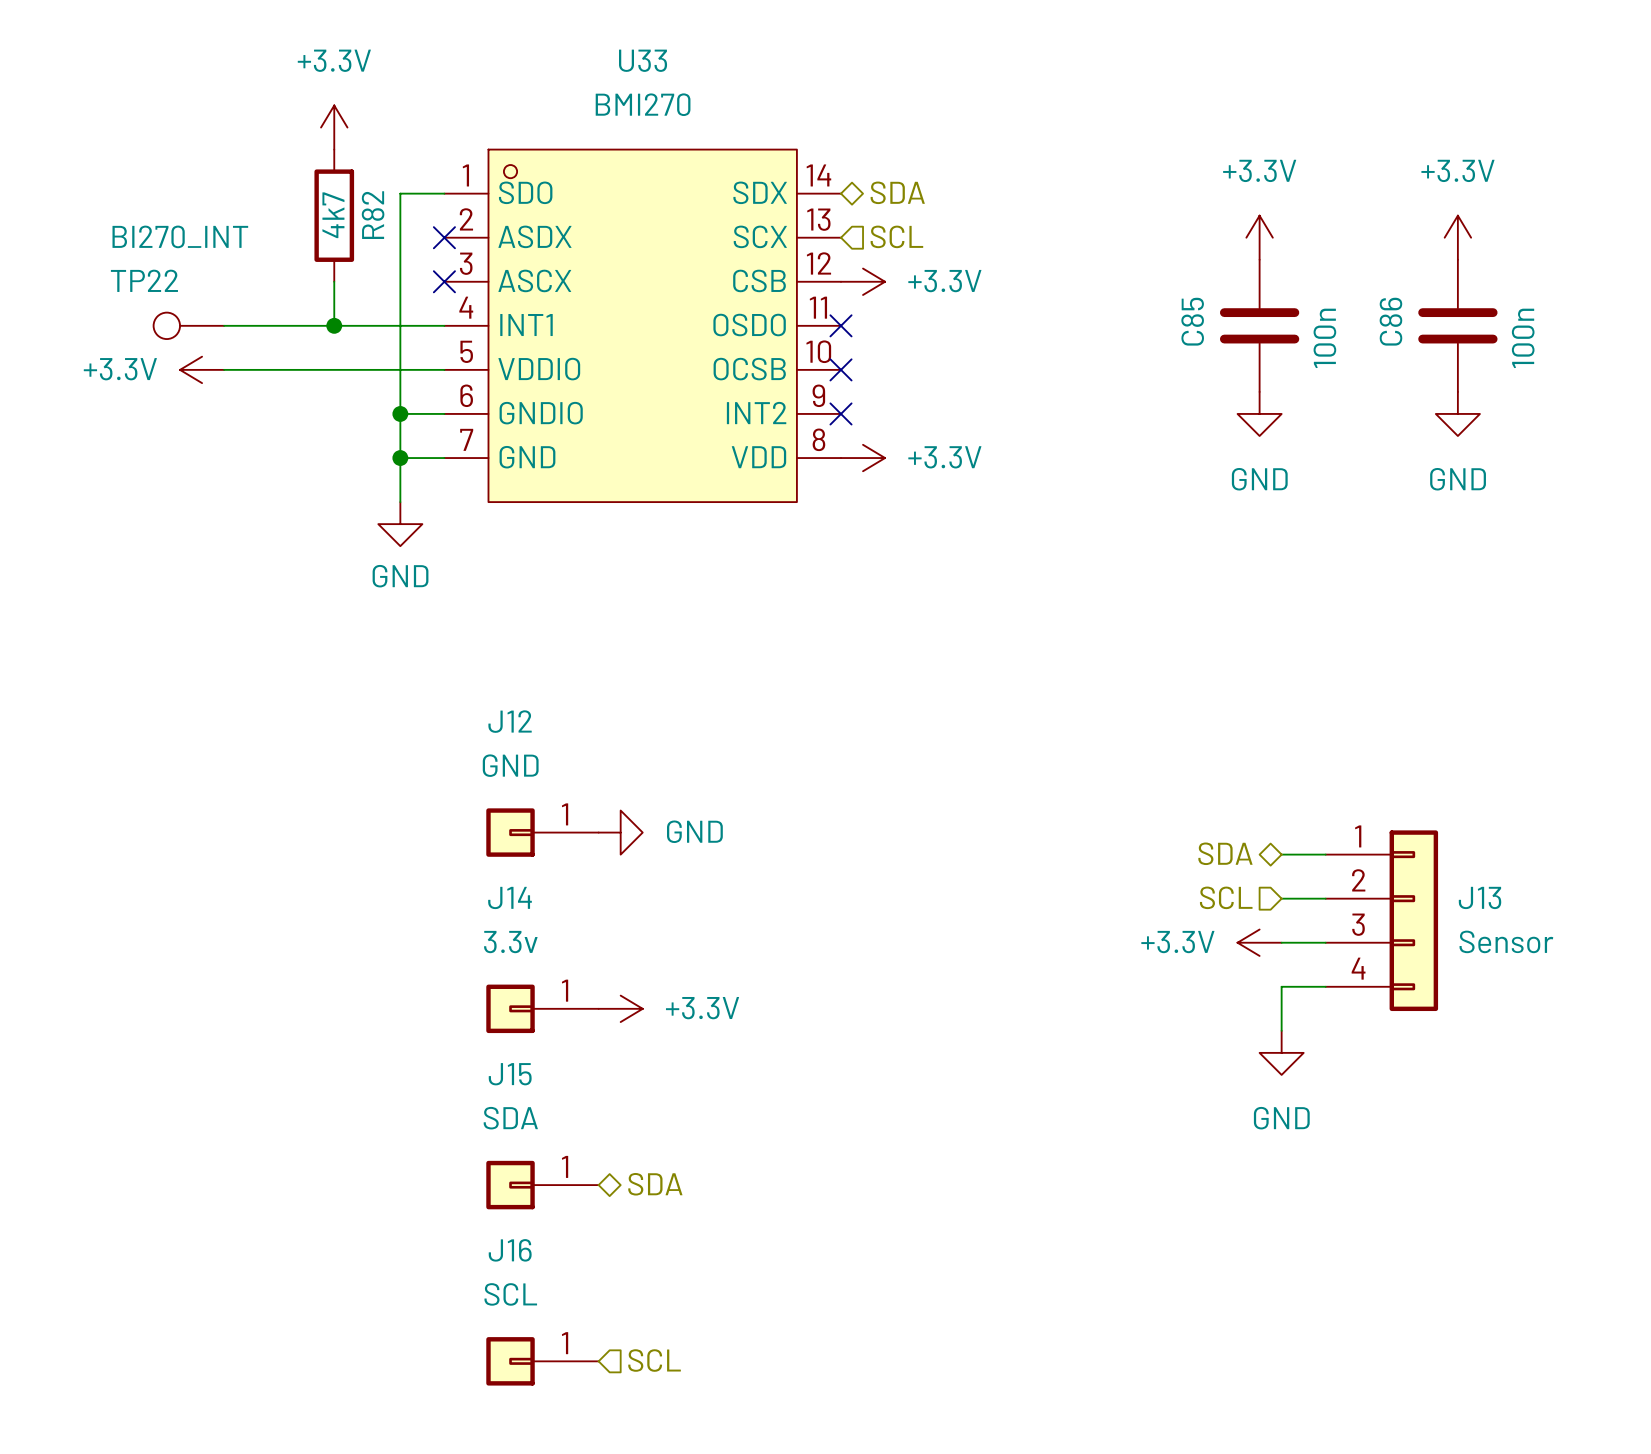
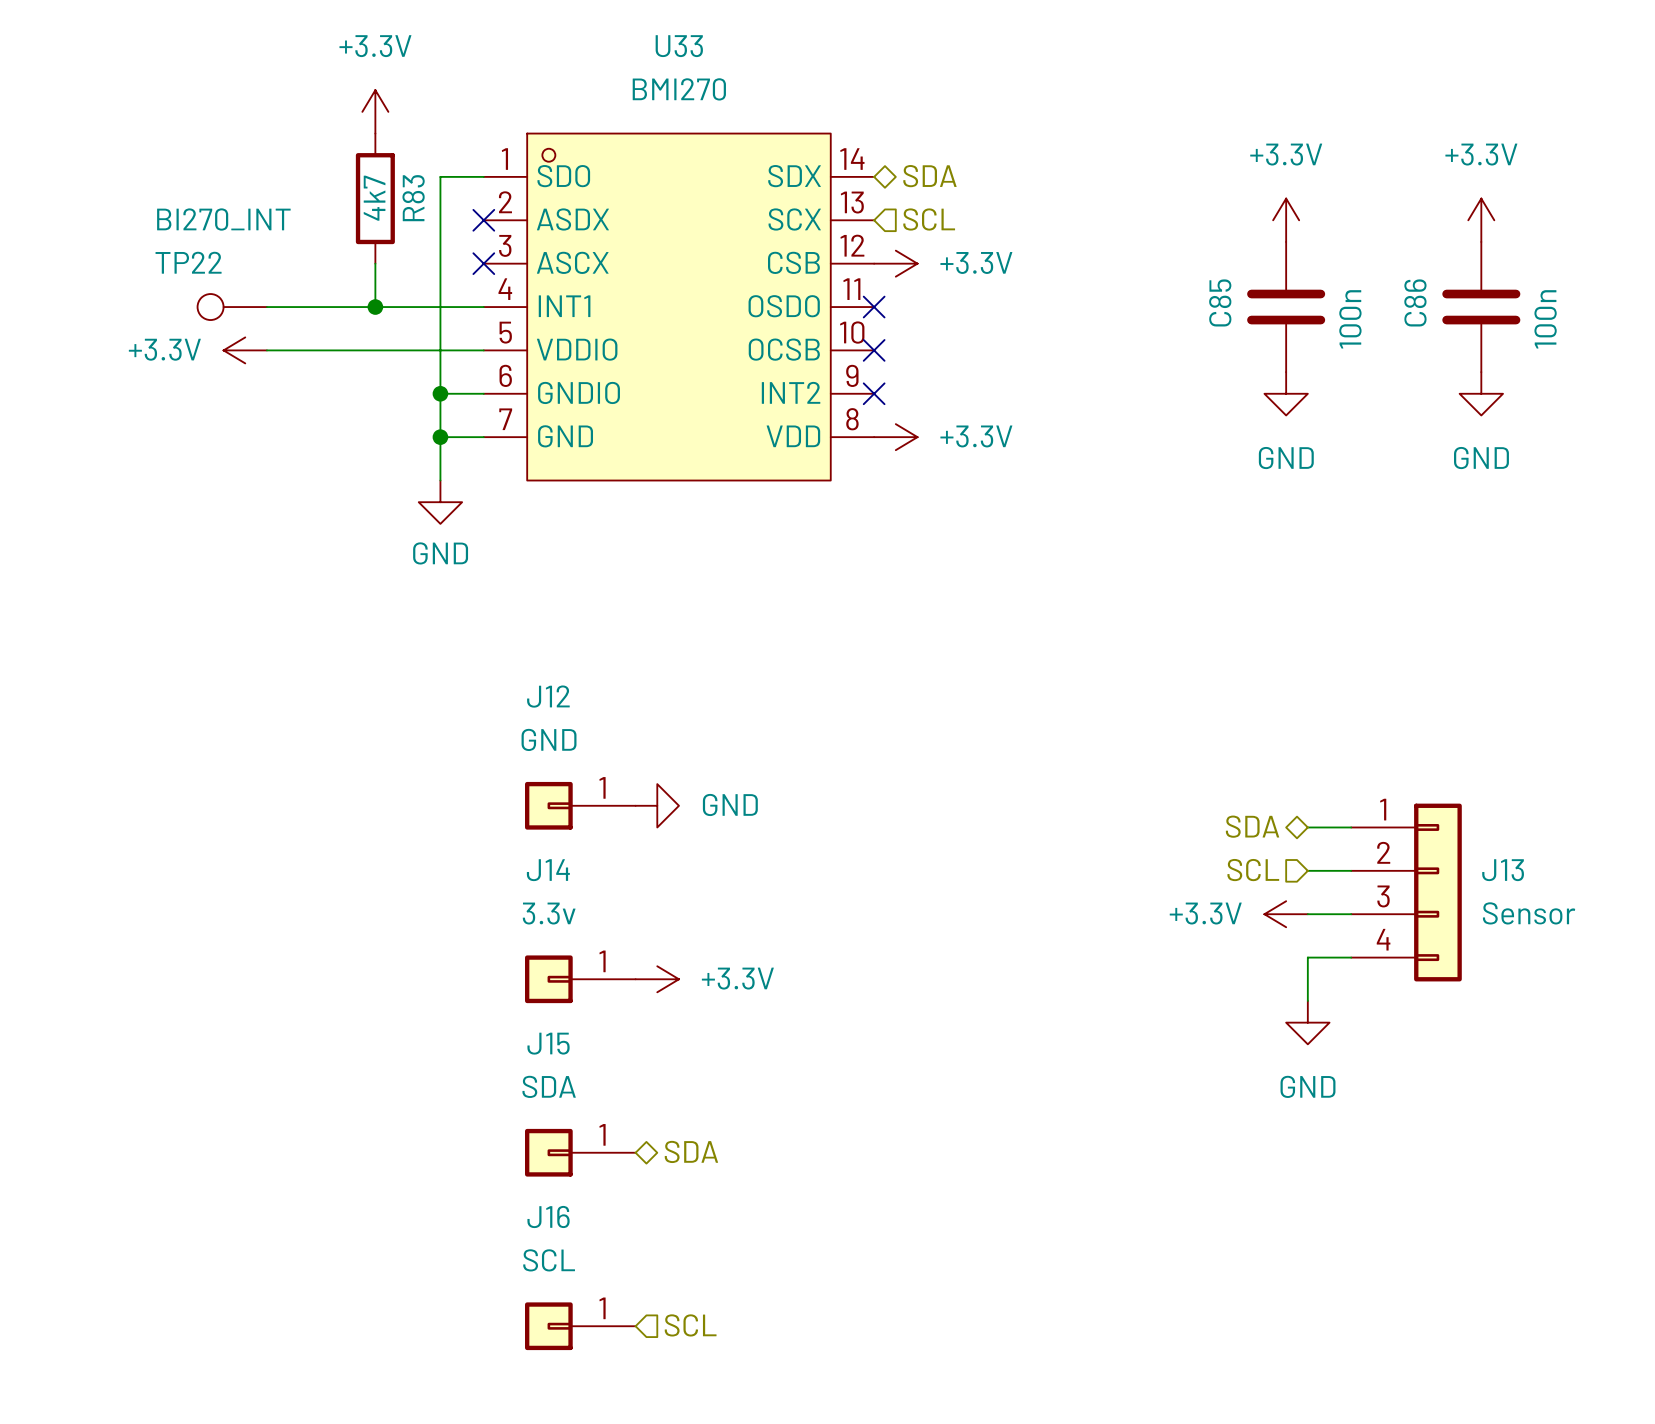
R82 name: R82 (373, 215) -> R83 (413, 198)

